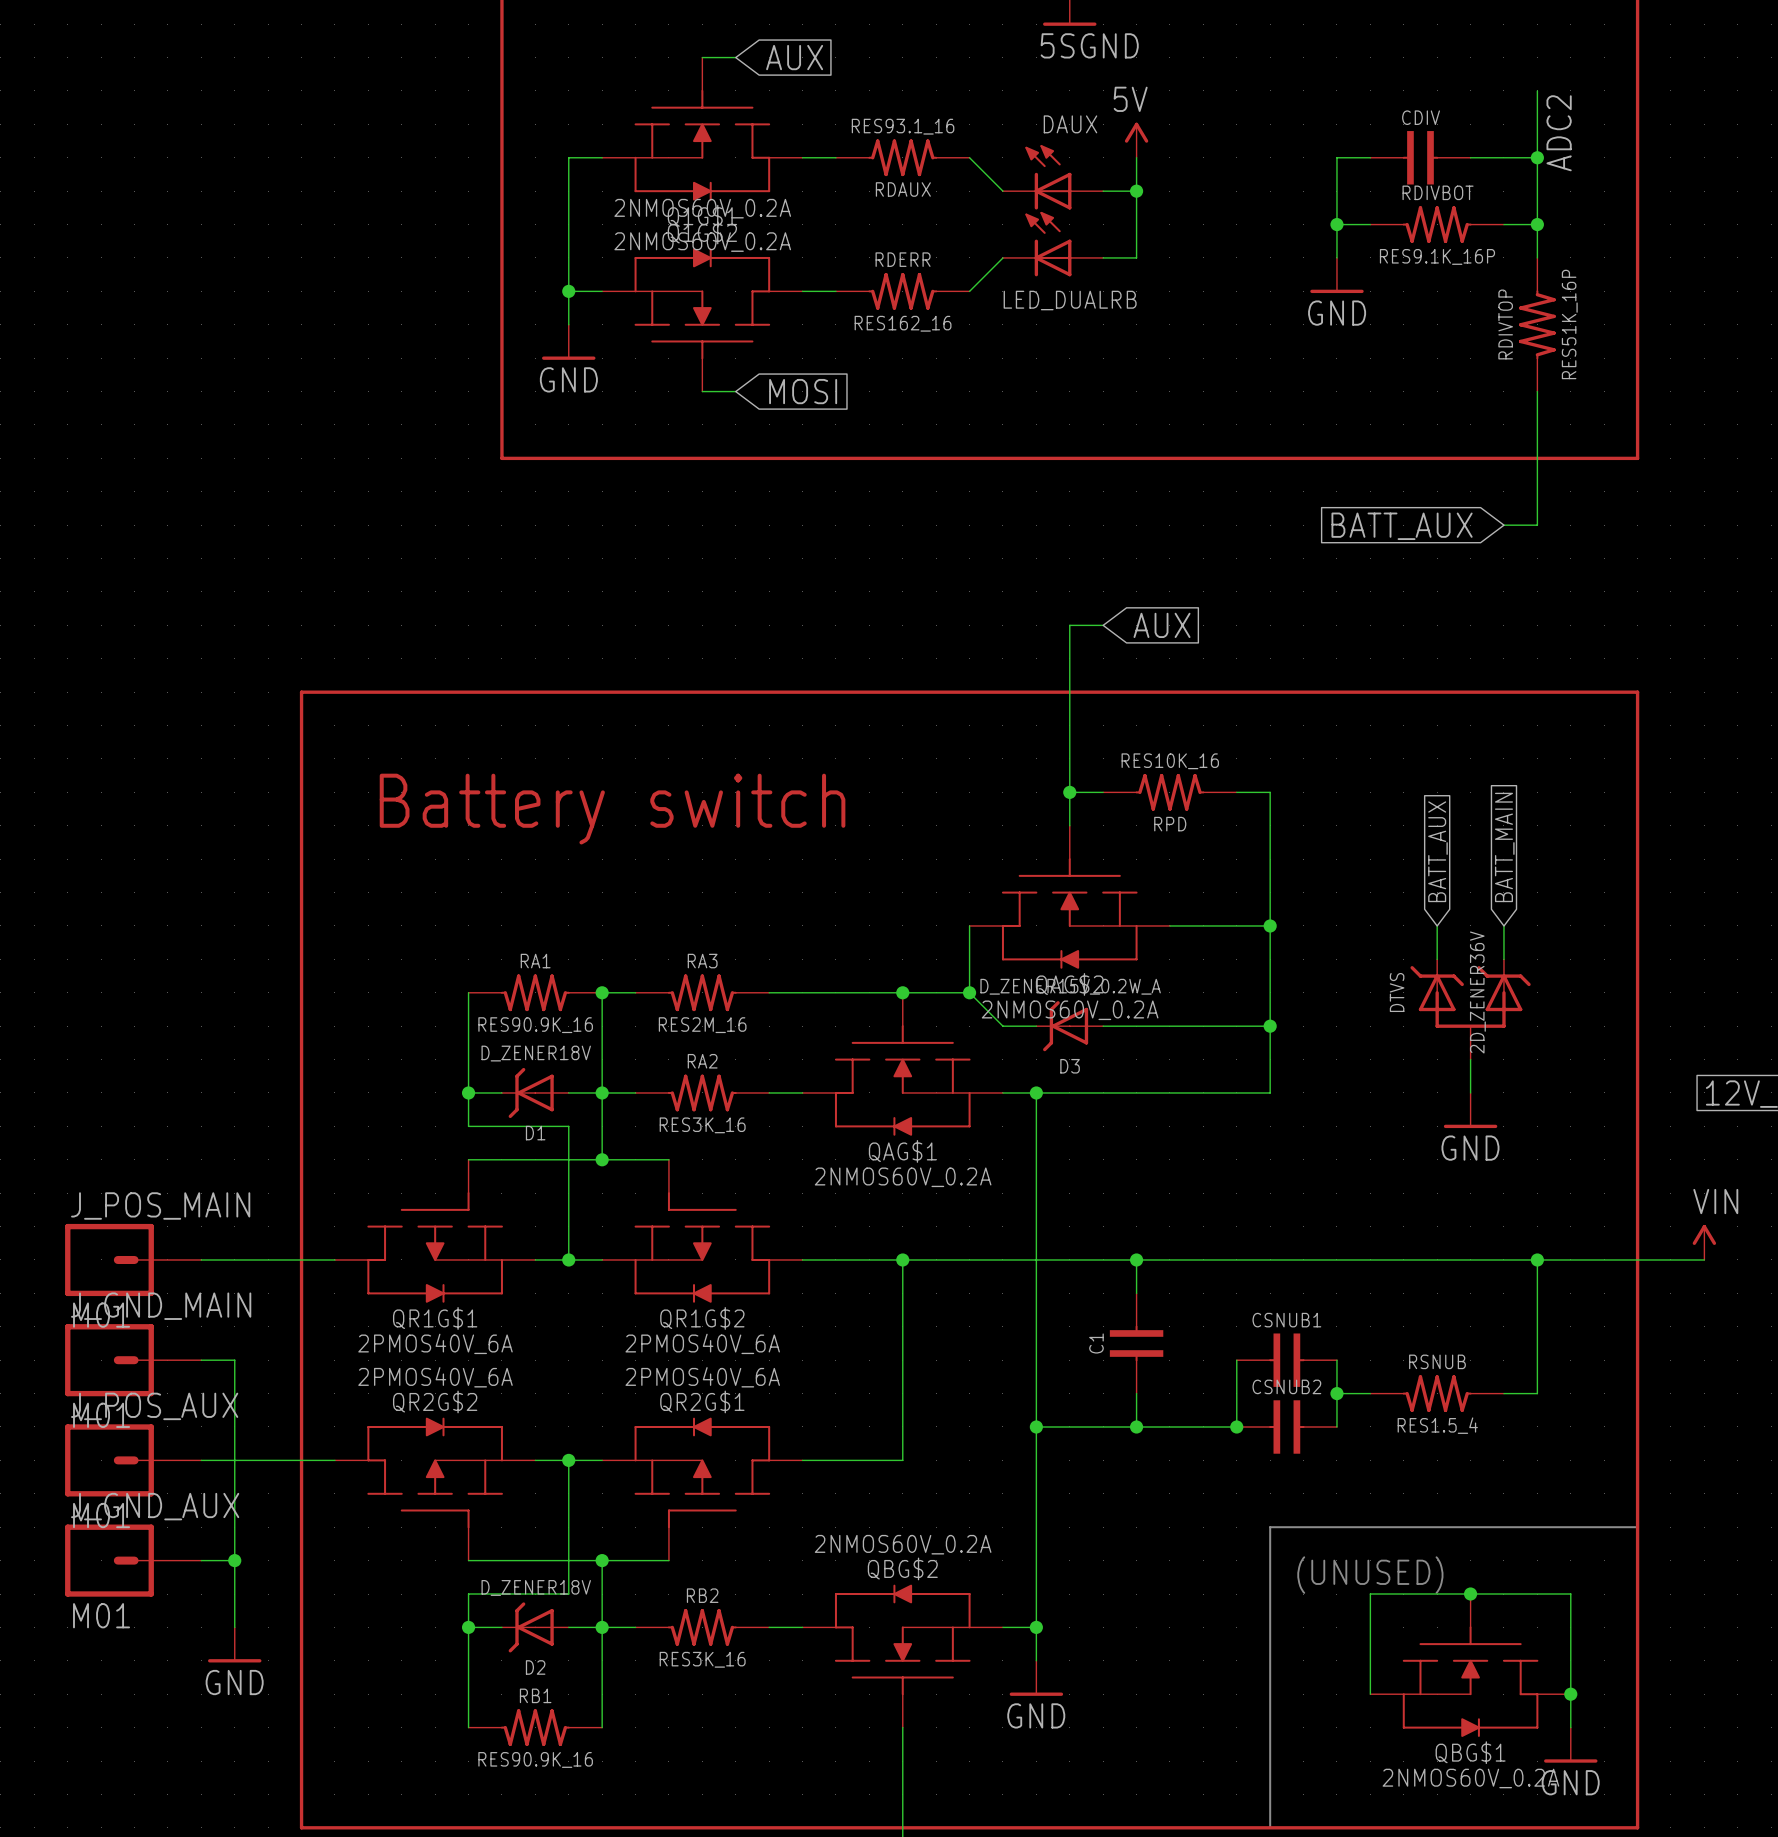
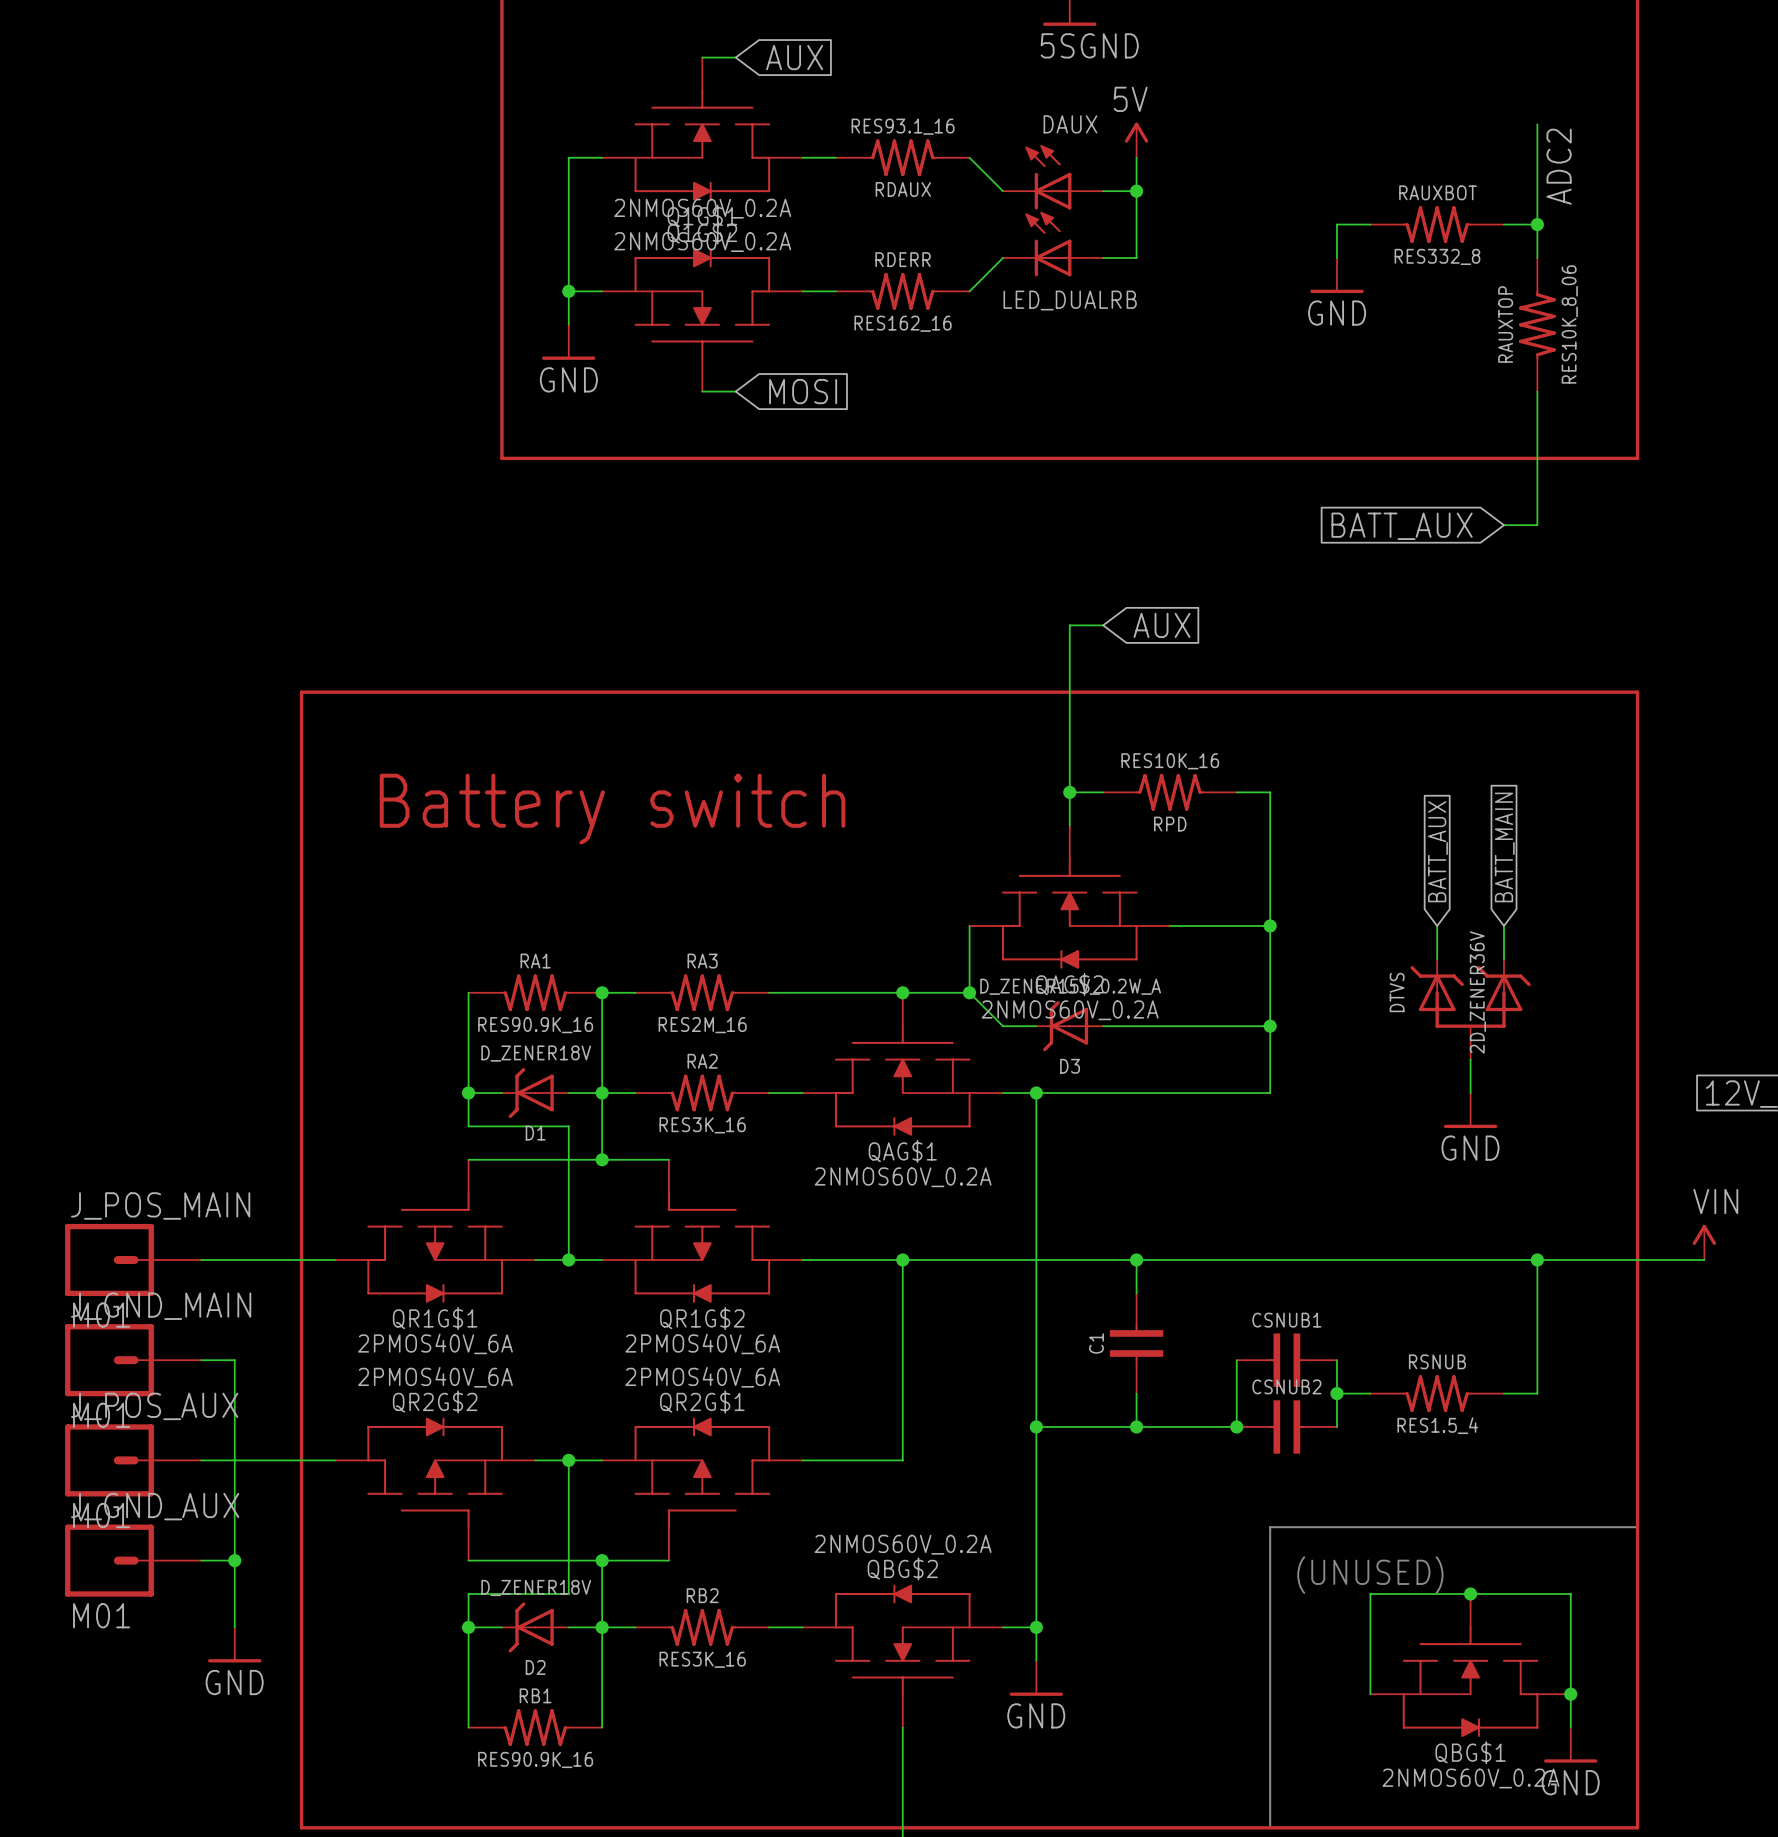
wire: (1537, 90) (1537, 124) -> none
label position: ADC2 (1559, 133) -> ADC2 (1559, 166)
wire: (1370, 157) (1336, 157) (1336, 224) -> none
CDIV: (1420, 157) -> none
wire: (1470, 157) (1537, 157) -> none
junction: (1537, 157) -> none
RDIVBOT name: RDIVBOT (1438, 192) -> RAUXBOT (1438, 192)
junction: (1336, 224) -> none
RDIVBOT value: RES9.1K_16P (1437, 256) -> RES332_8 (1437, 256)
RDIVTOP name: RDIVTOP (1505, 324) -> RAUXTOP (1505, 324)
RDIVTOP value: RES51K_16P (1569, 324) -> RES10K_8_06 (1569, 324)

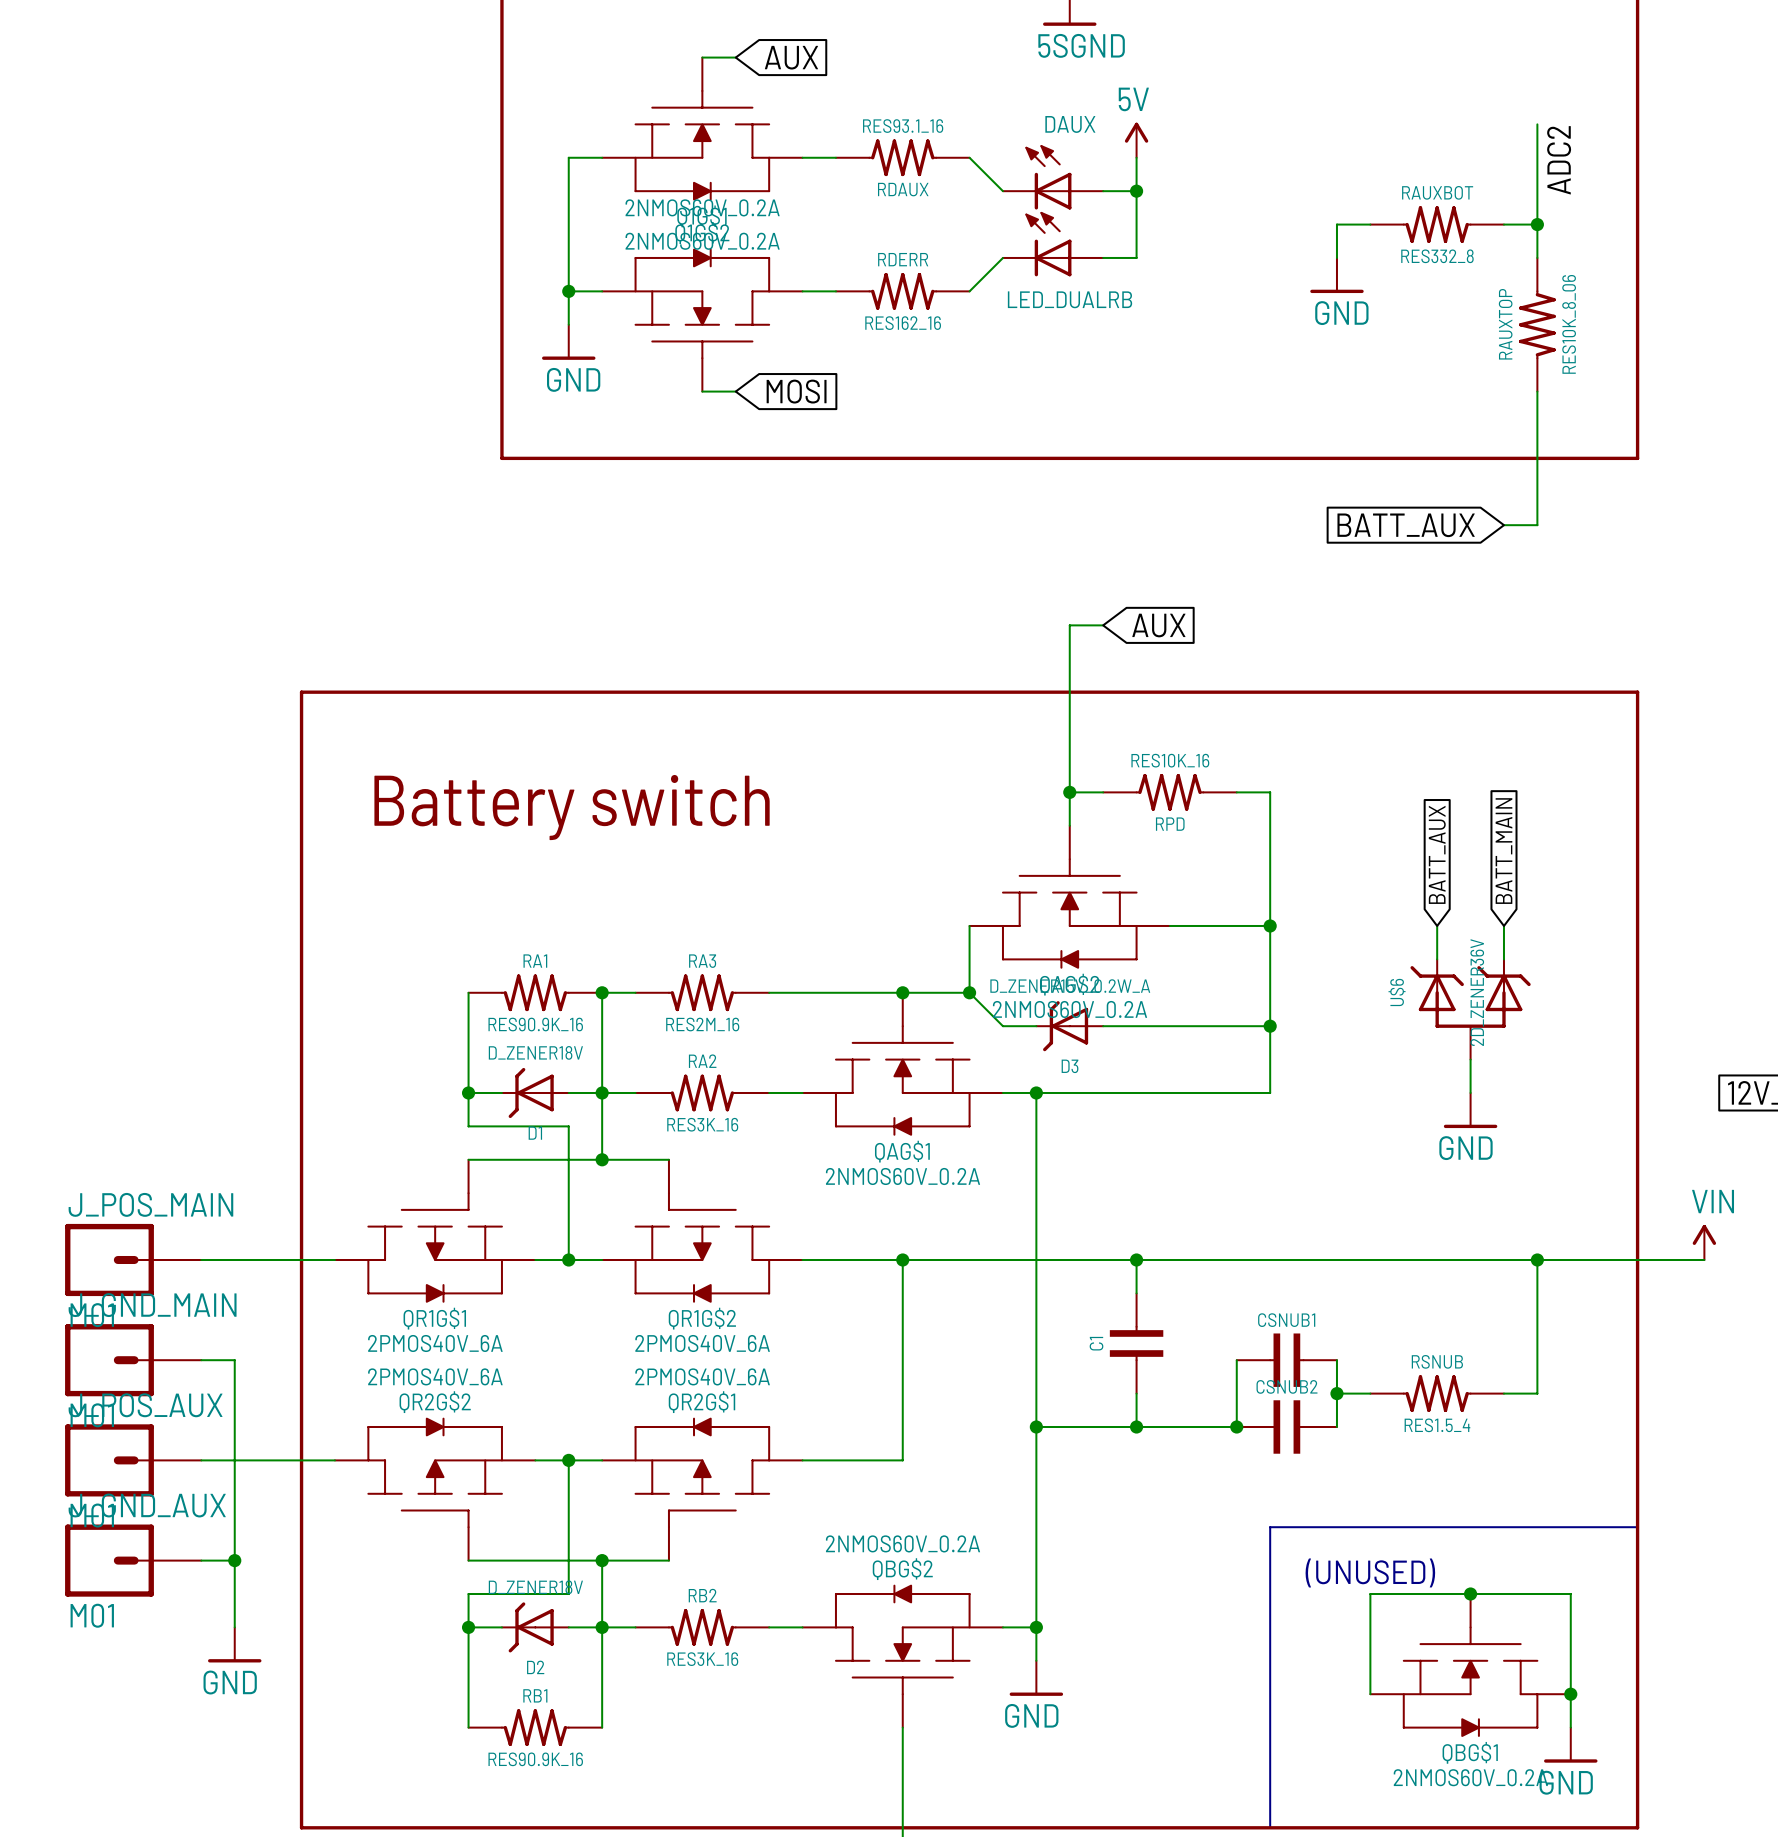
DTVS name: DTVS (1397, 992) -> U$6 (1397, 992)

